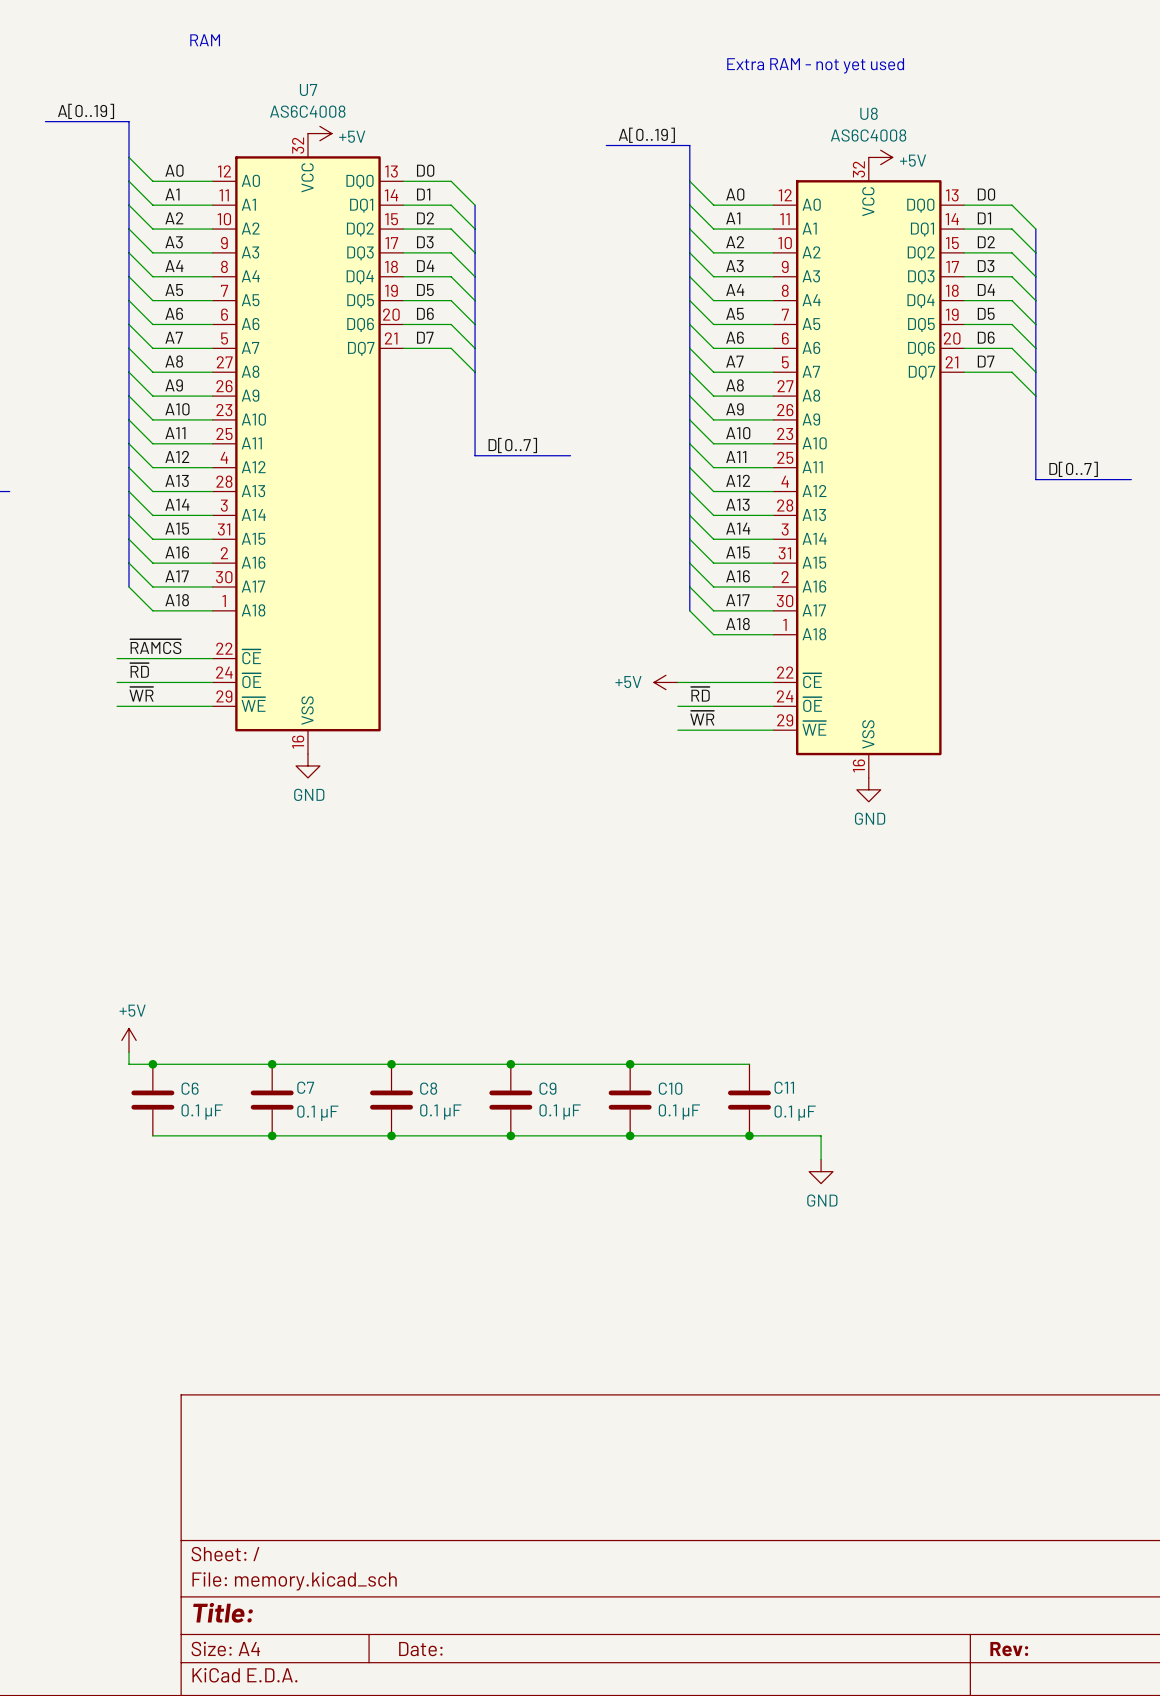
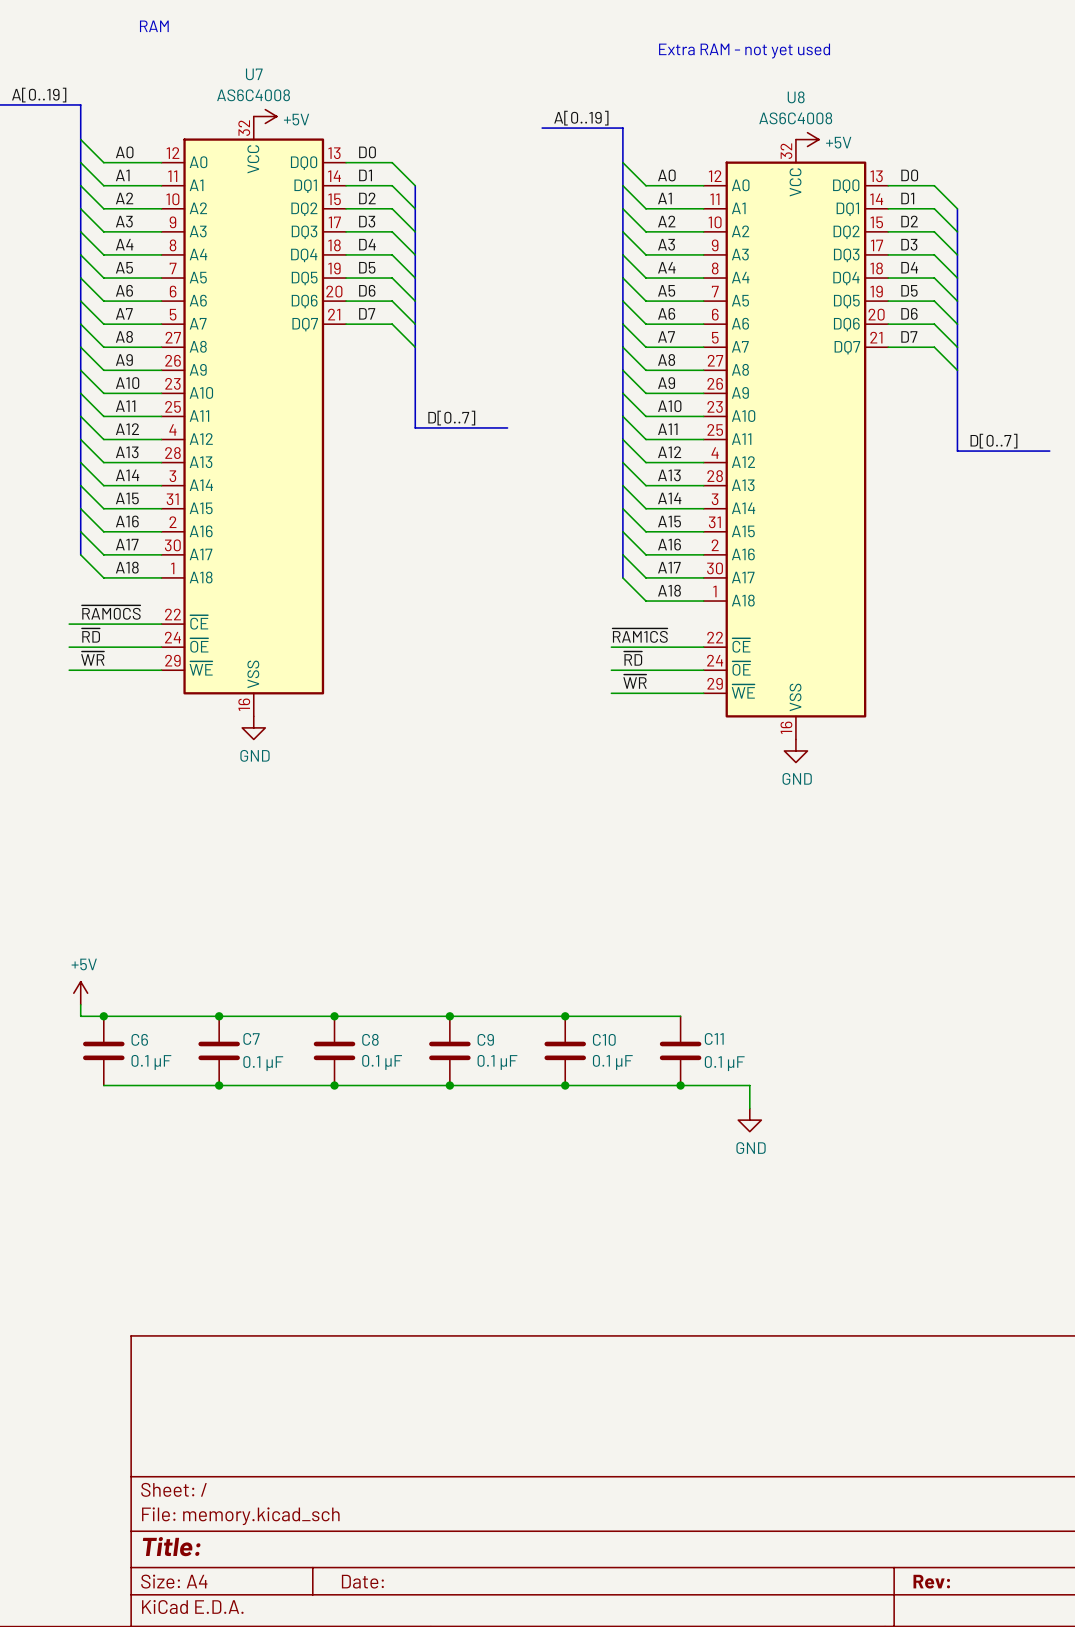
label: ~{RAMCS} (155, 646) -> ~{RAM0CS} (111, 612)
label: none -> ~{RAM1CS} (640, 635)
power symbol: +5V (665, 682) -> none

